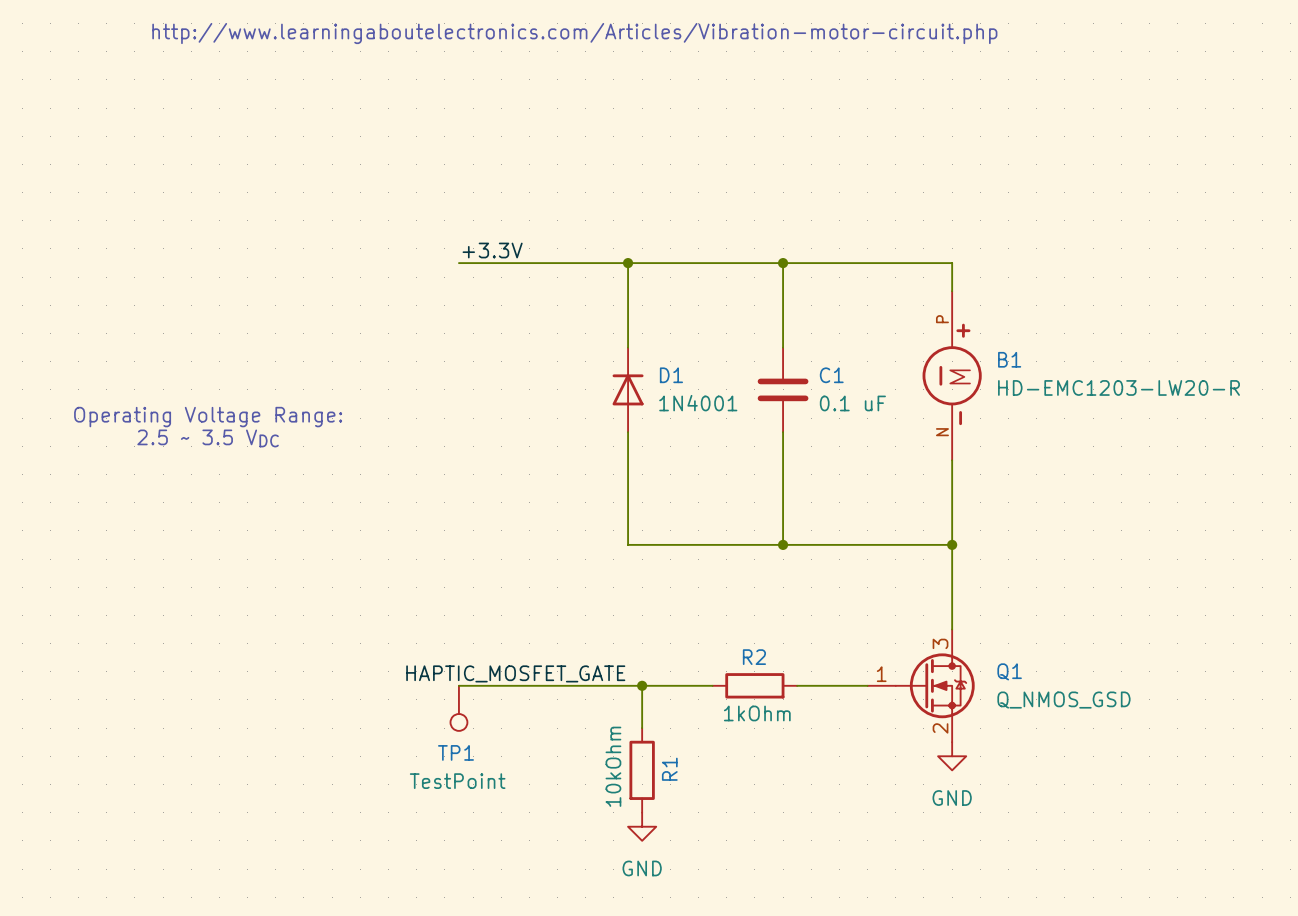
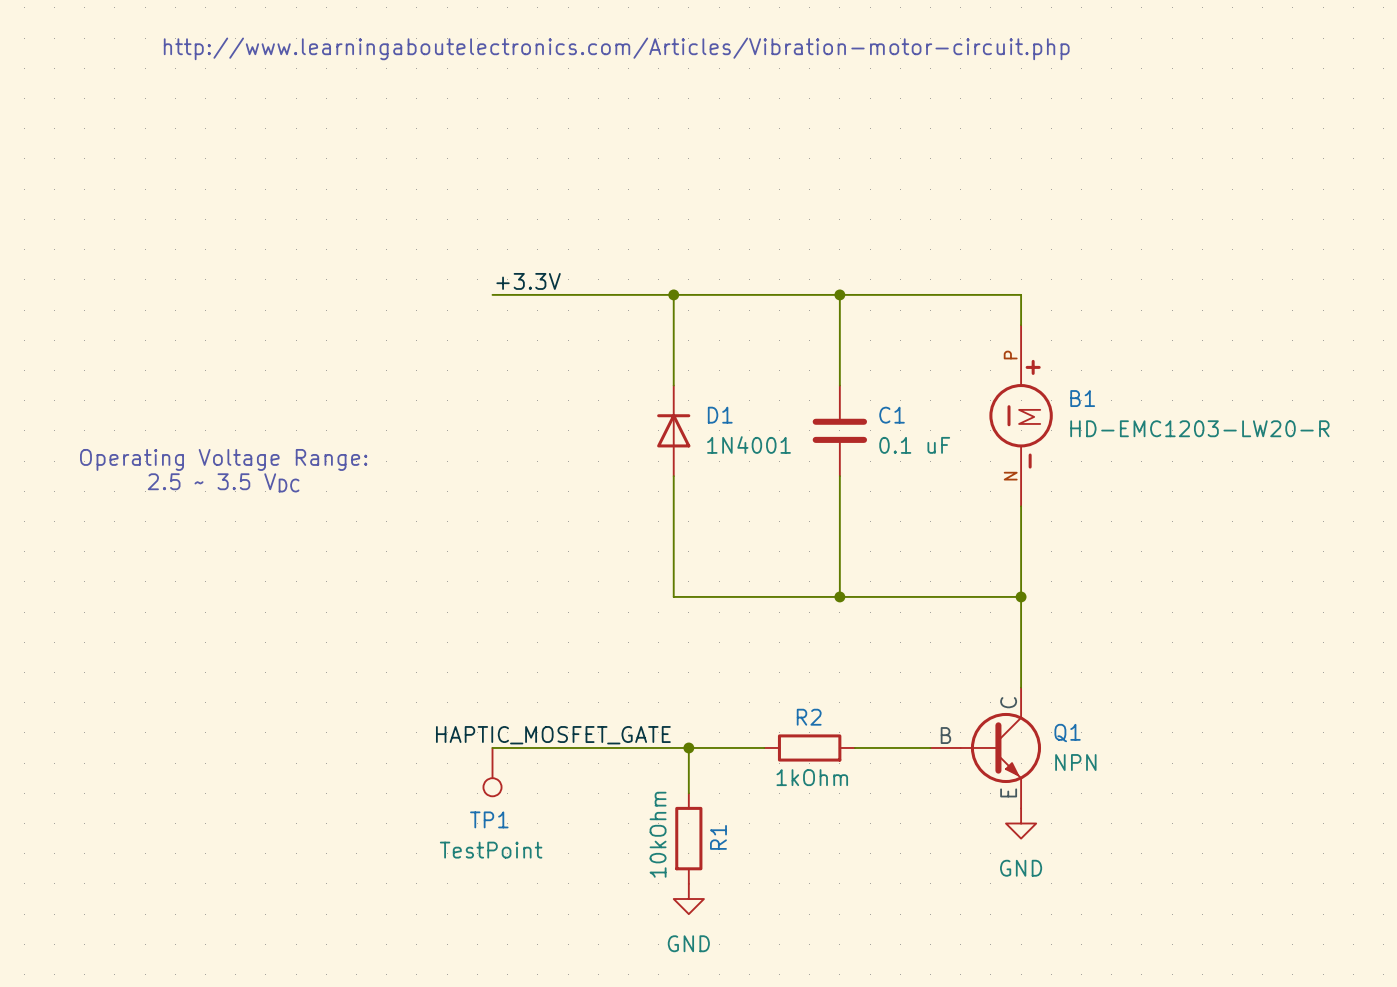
Q1 symbol: [867, 629, 975, 743] -> [930, 687, 1042, 809]
Q1 value: Q_NMOS_GSD (1063, 700) -> NPN (1075, 762)

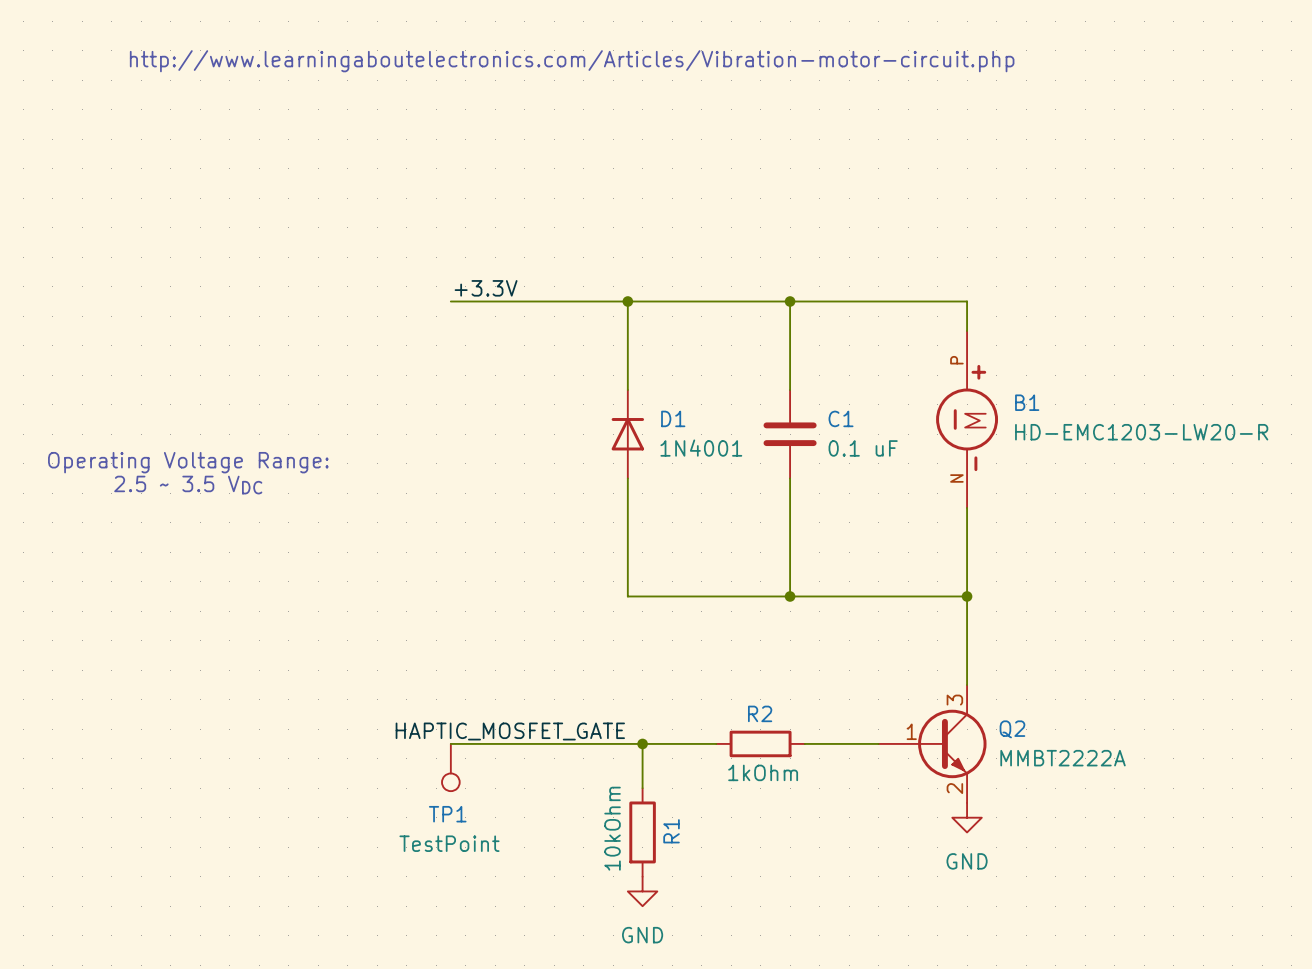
Q1: NPN (985, 747) -> none
Q2: none -> MMBT2222A (932, 743)

